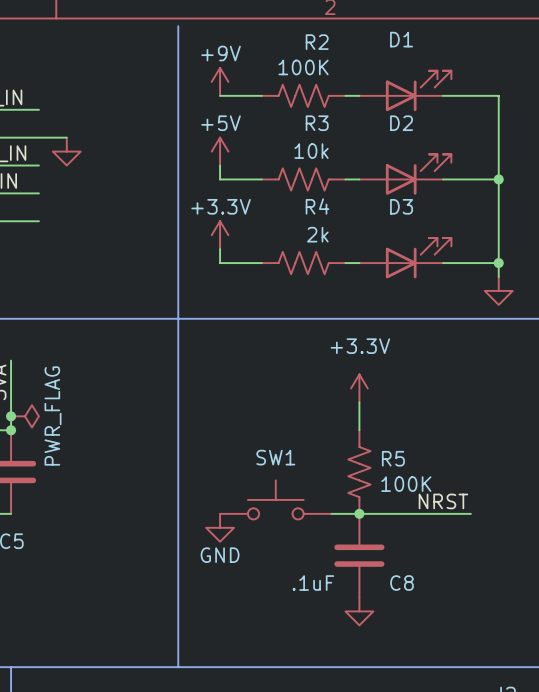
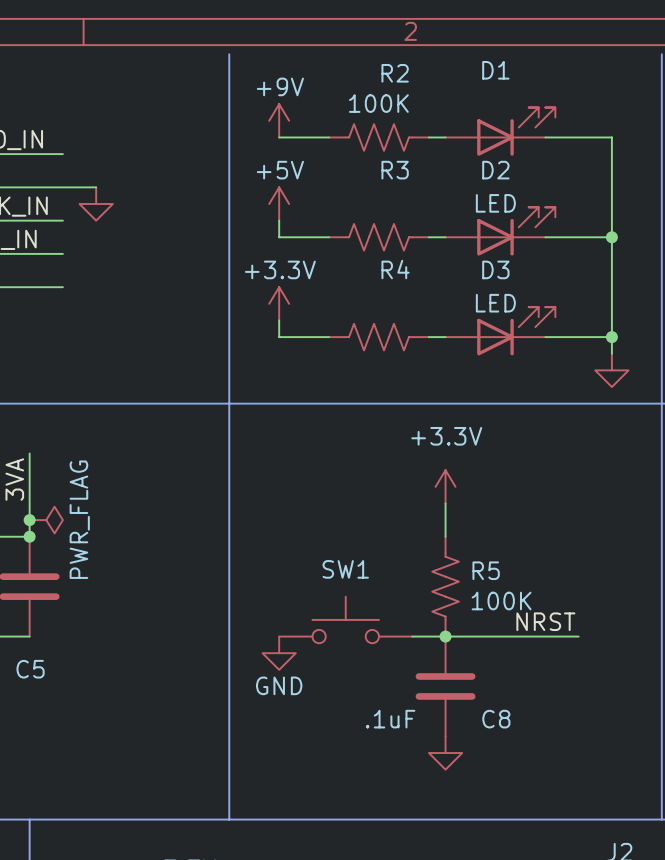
R3 value: 10k (311, 151) -> none
D2 value: none -> LED (495, 203)
R4 value: 2k (317, 234) -> none
D3 value: none -> LED (495, 303)

